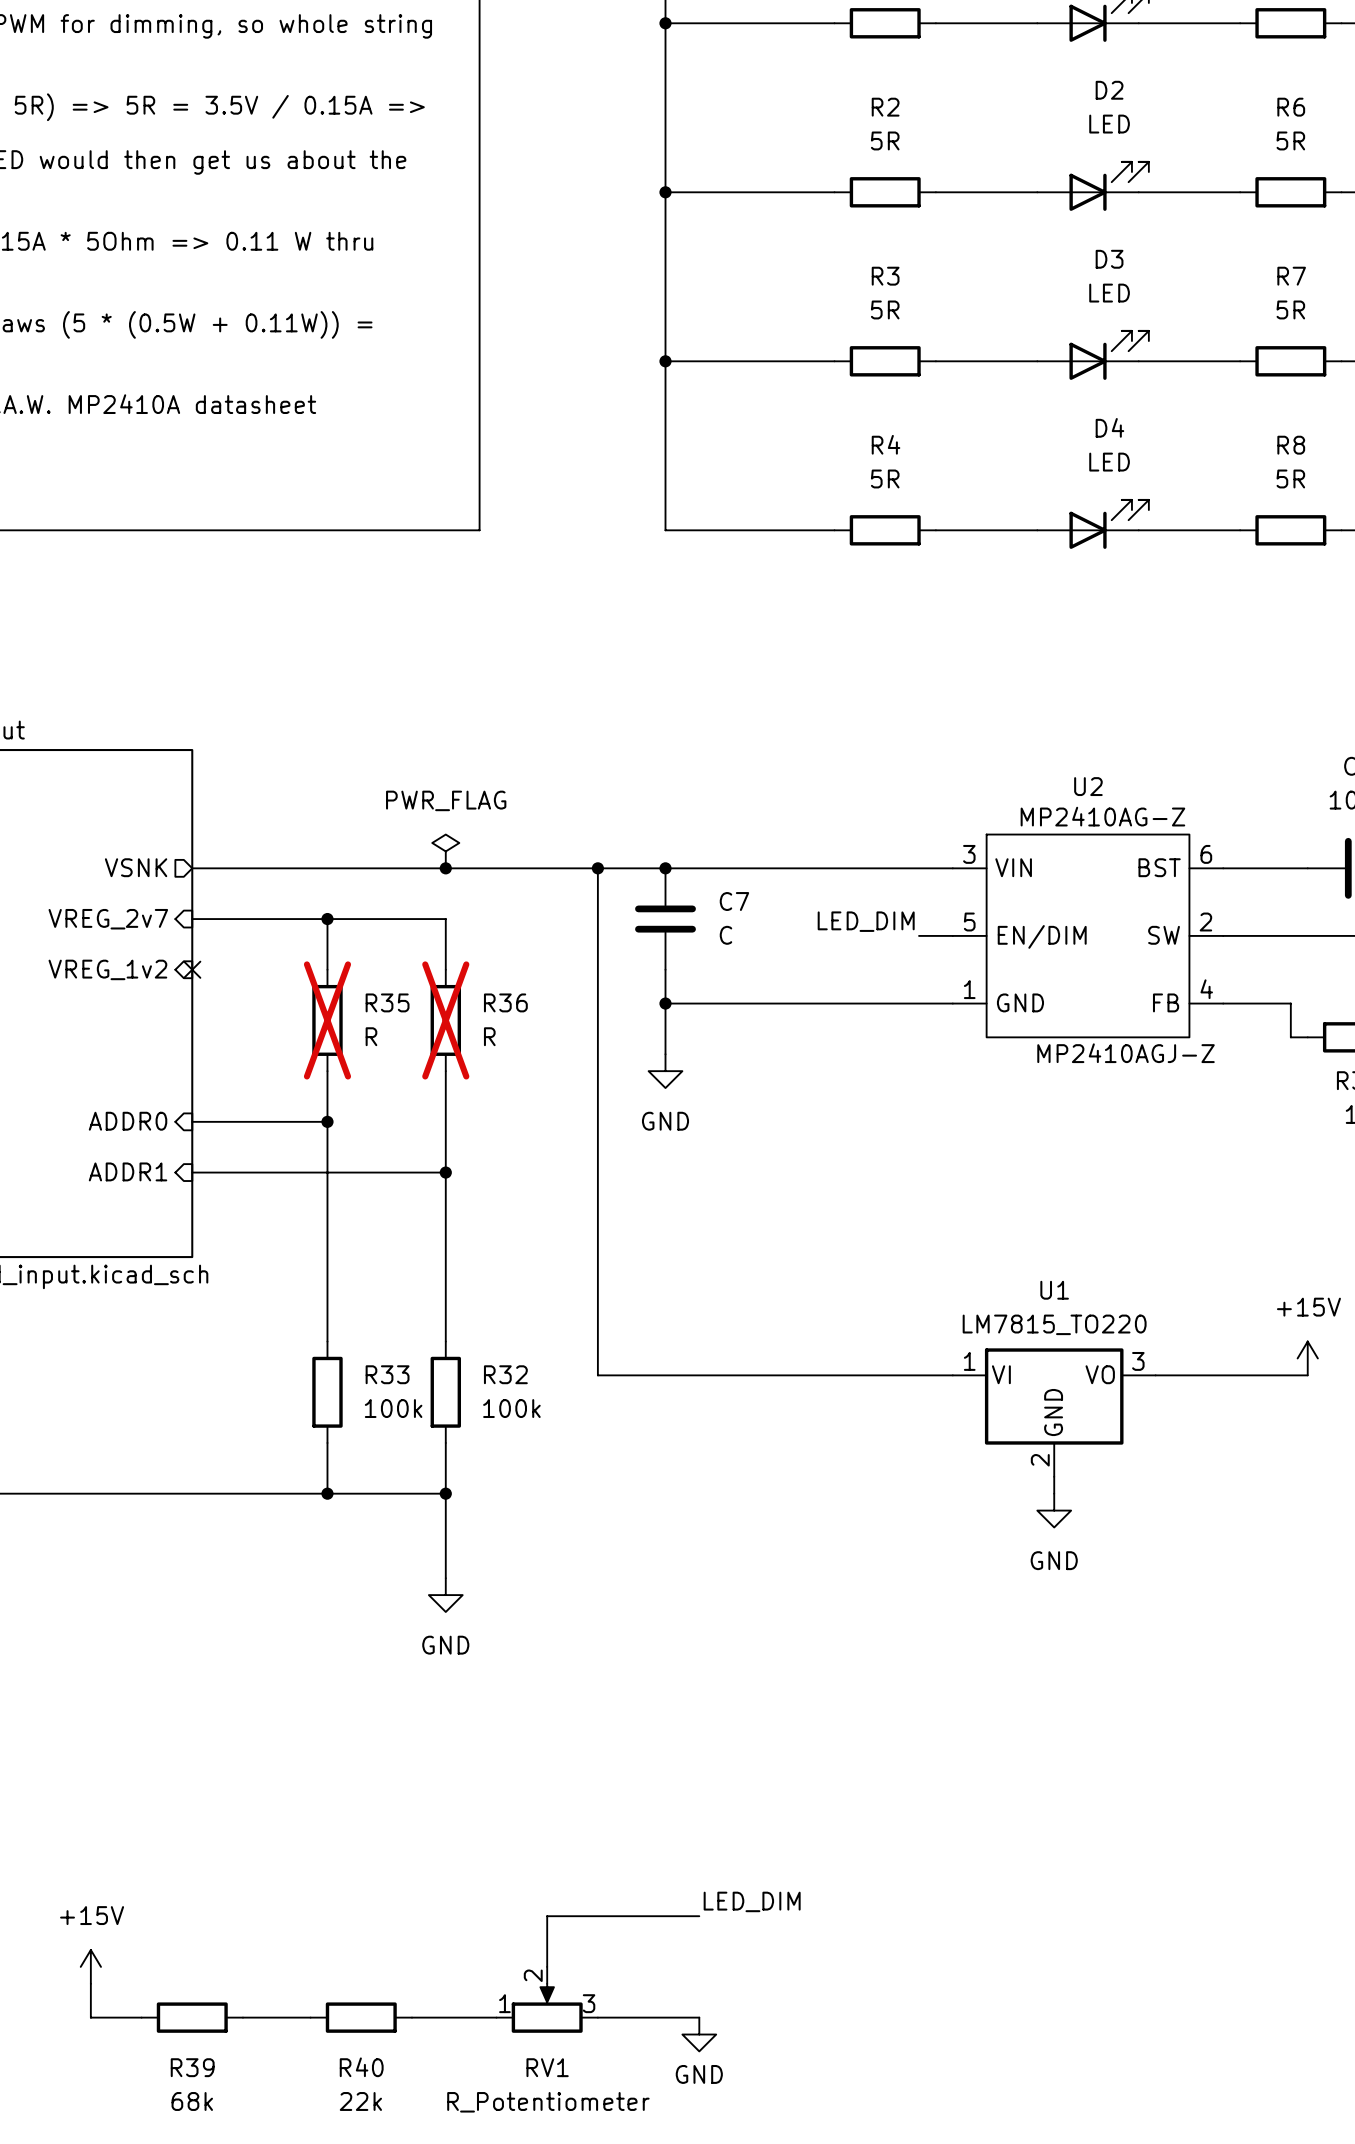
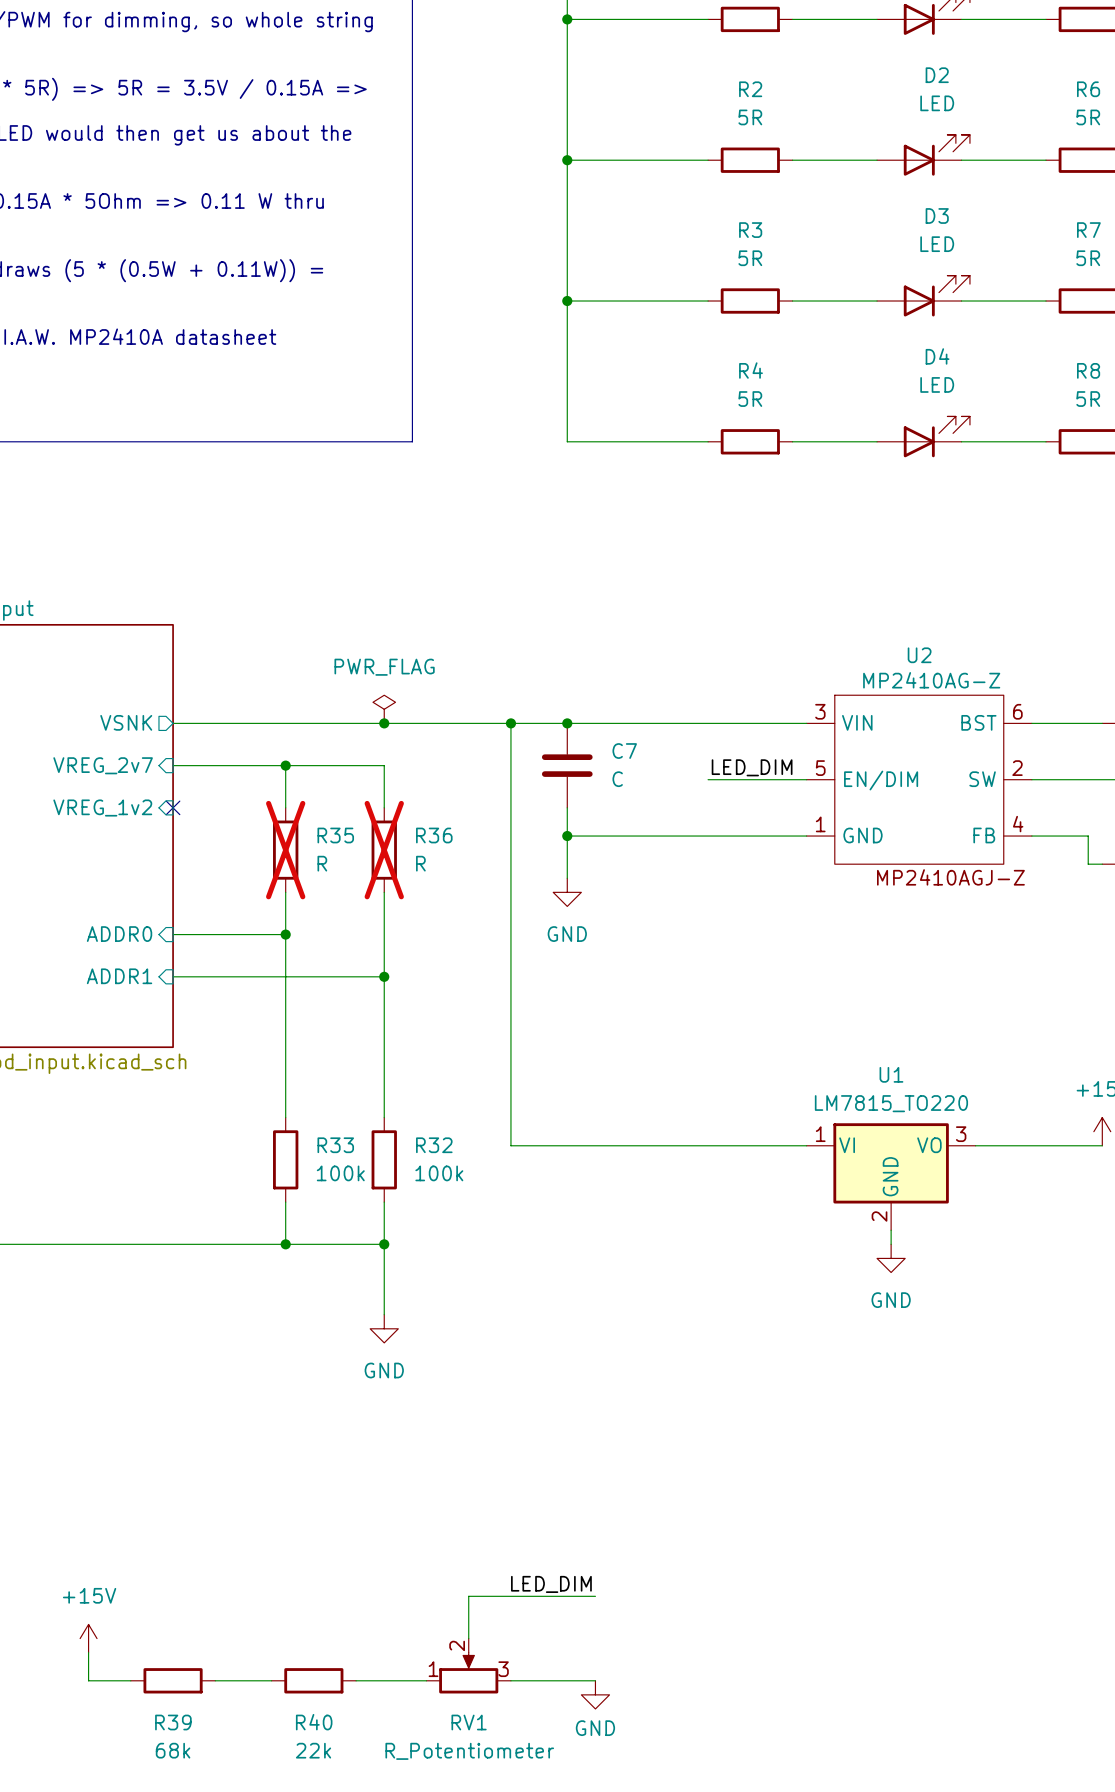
label position: LED_DIM (866, 921) -> LED_DIM (752, 767)
wire: none -> (708, 779) (778, 779)
label position: LED_DIM (752, 1901) -> LED_DIM (551, 1584)

